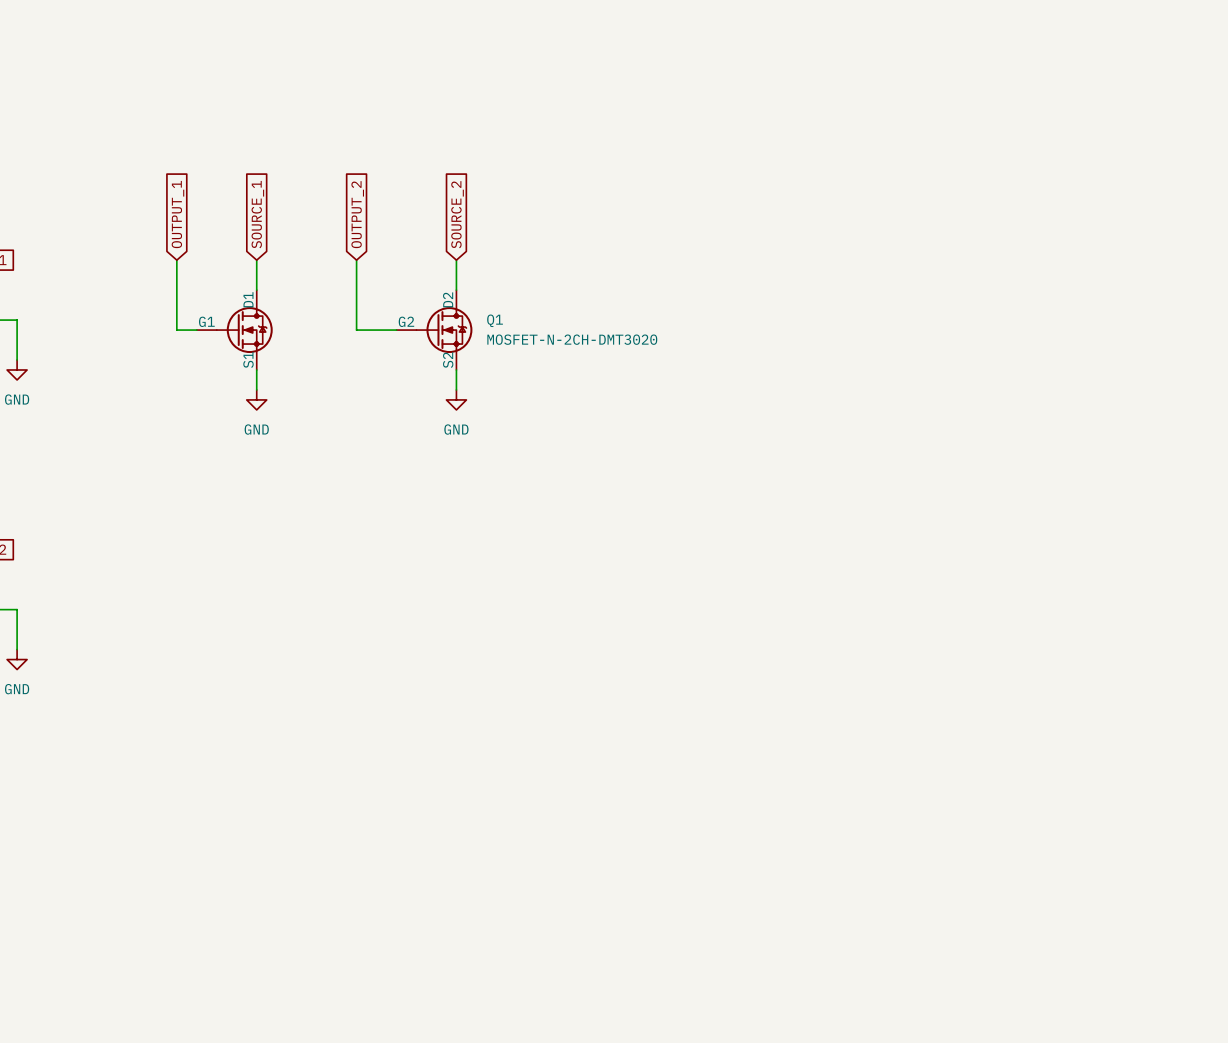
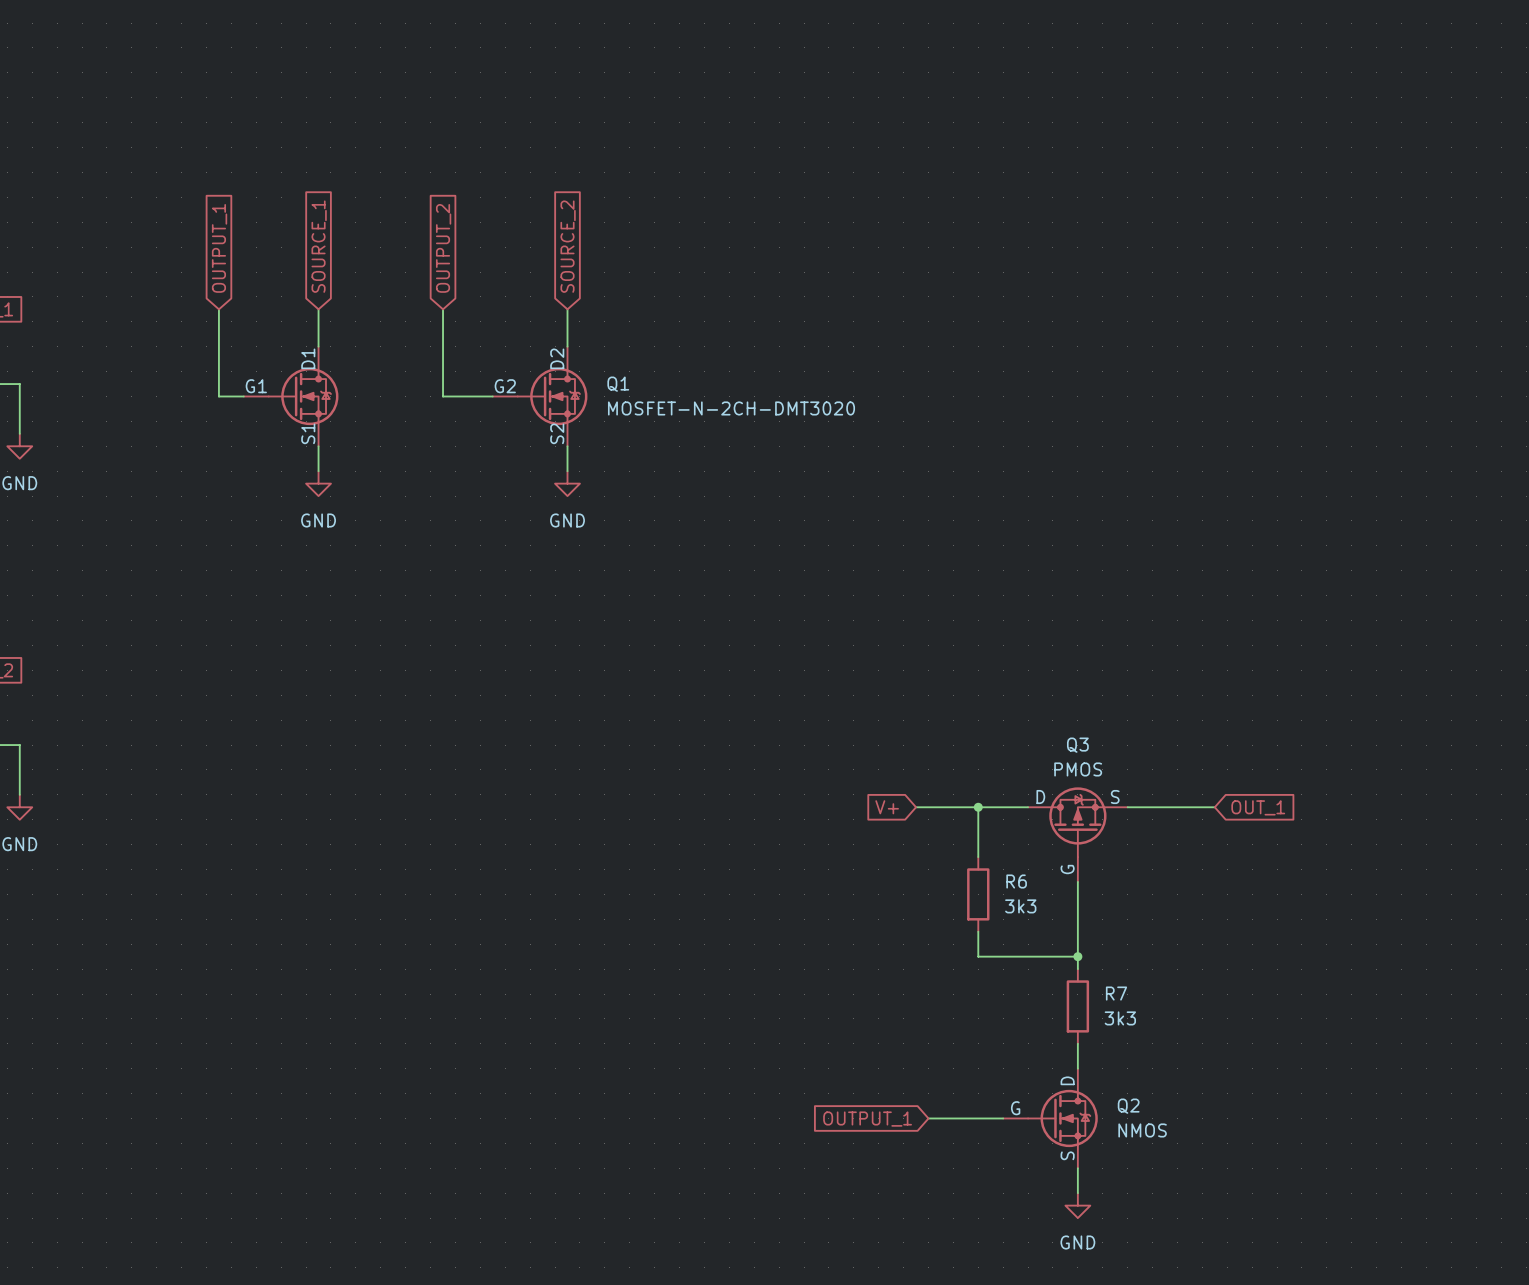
global label: none -> V+ (887, 807)
wire: none -> (916, 807) (1028, 807)
wire: none -> (978, 807) (978, 857)
junction: none -> (978, 807)
wire: none -> (1127, 807) (1214, 807)
global label: none -> OUT_1 (1258, 807)
Q3: none -> PMOS (1077, 834)
wire: none -> (1077, 881) (1077, 969)
R6: none -> 3k3 (978, 894)
wire: none -> (978, 931) (978, 956) (1077, 956)
junction: none -> (1077, 956)
R7: none -> 3k3 (1077, 1006)
wire: none -> (1077, 1043) (1077, 1068)
wire: none -> (928, 1118) (1003, 1118)
Q2: none -> NMOS (1050, 1118)
global label: none -> OUTPUT_1 (867, 1119)
wire: none -> (1077, 1168) (1077, 1193)
power symbol: none -> GND (1077, 1205)

